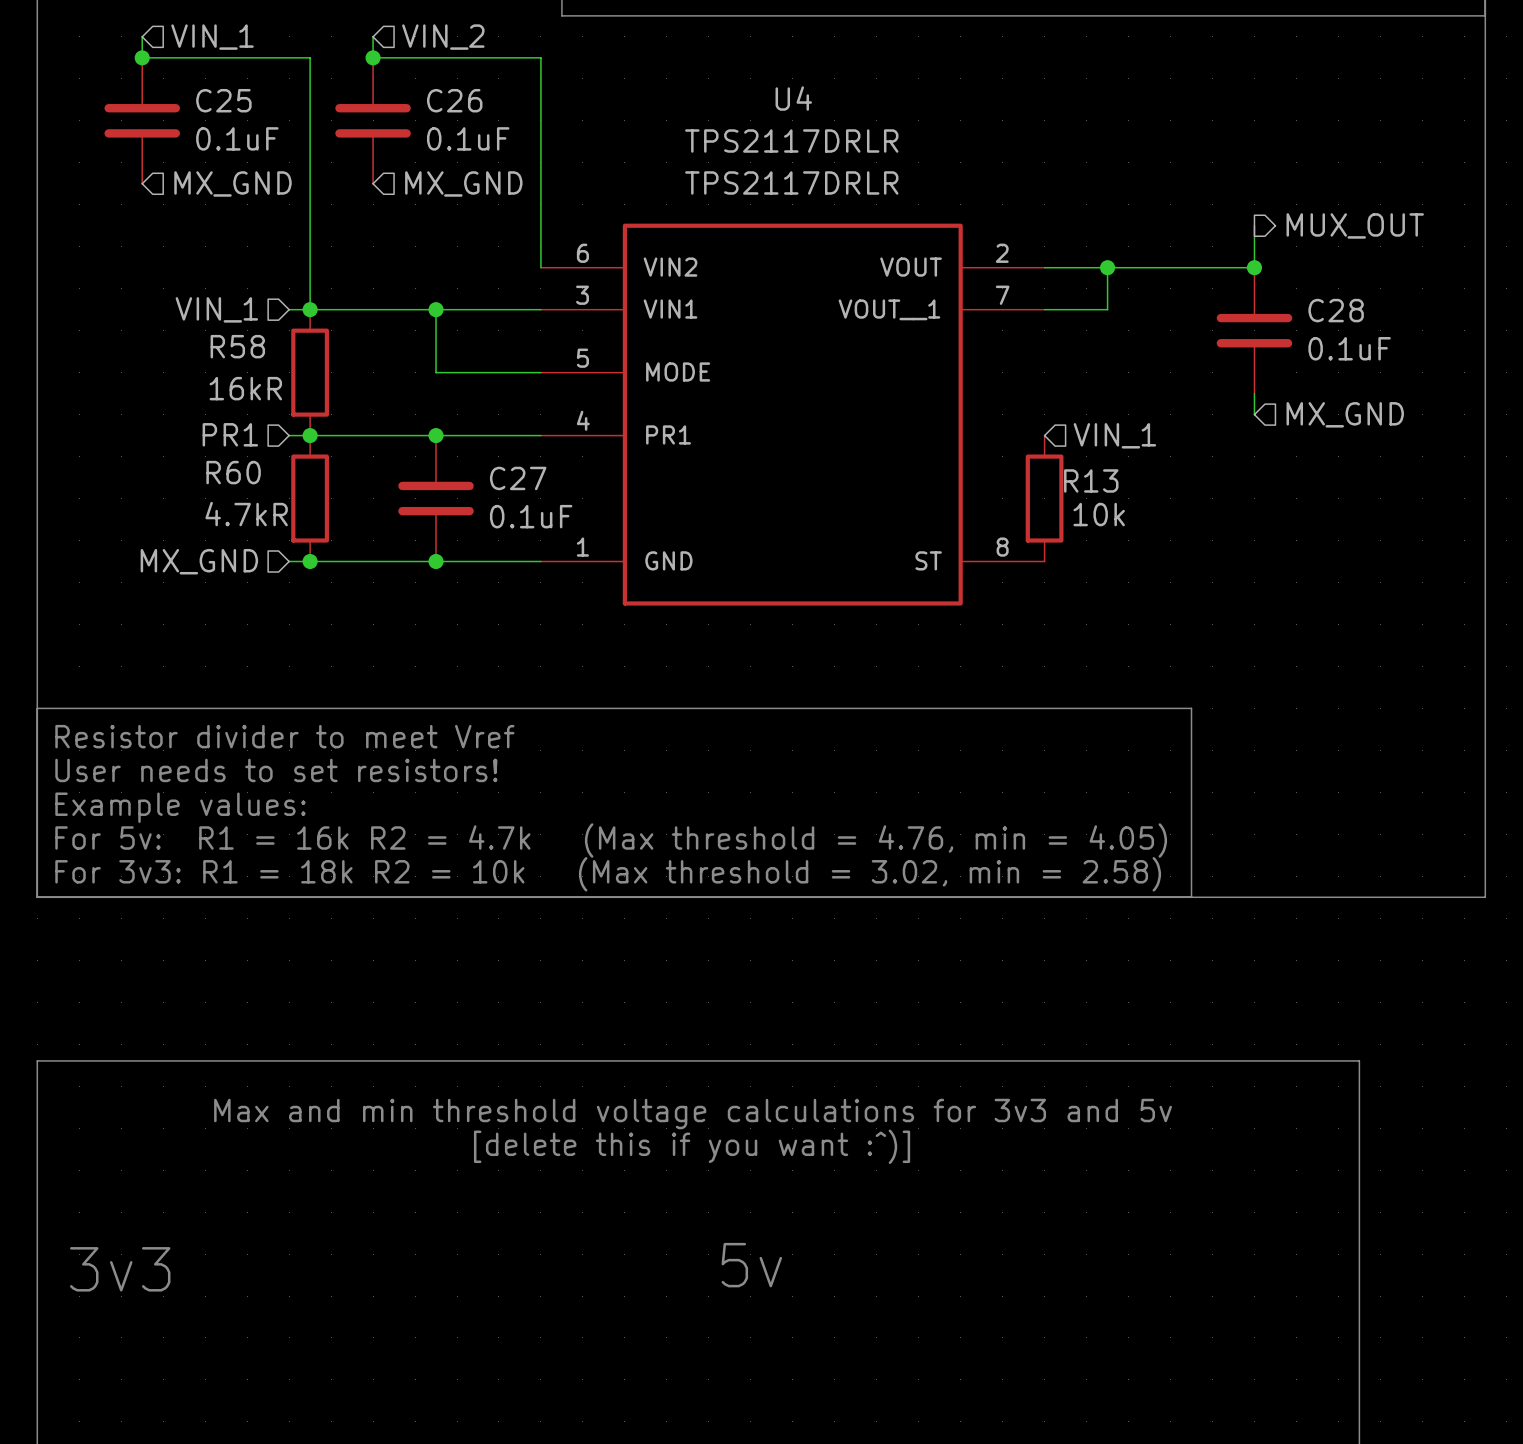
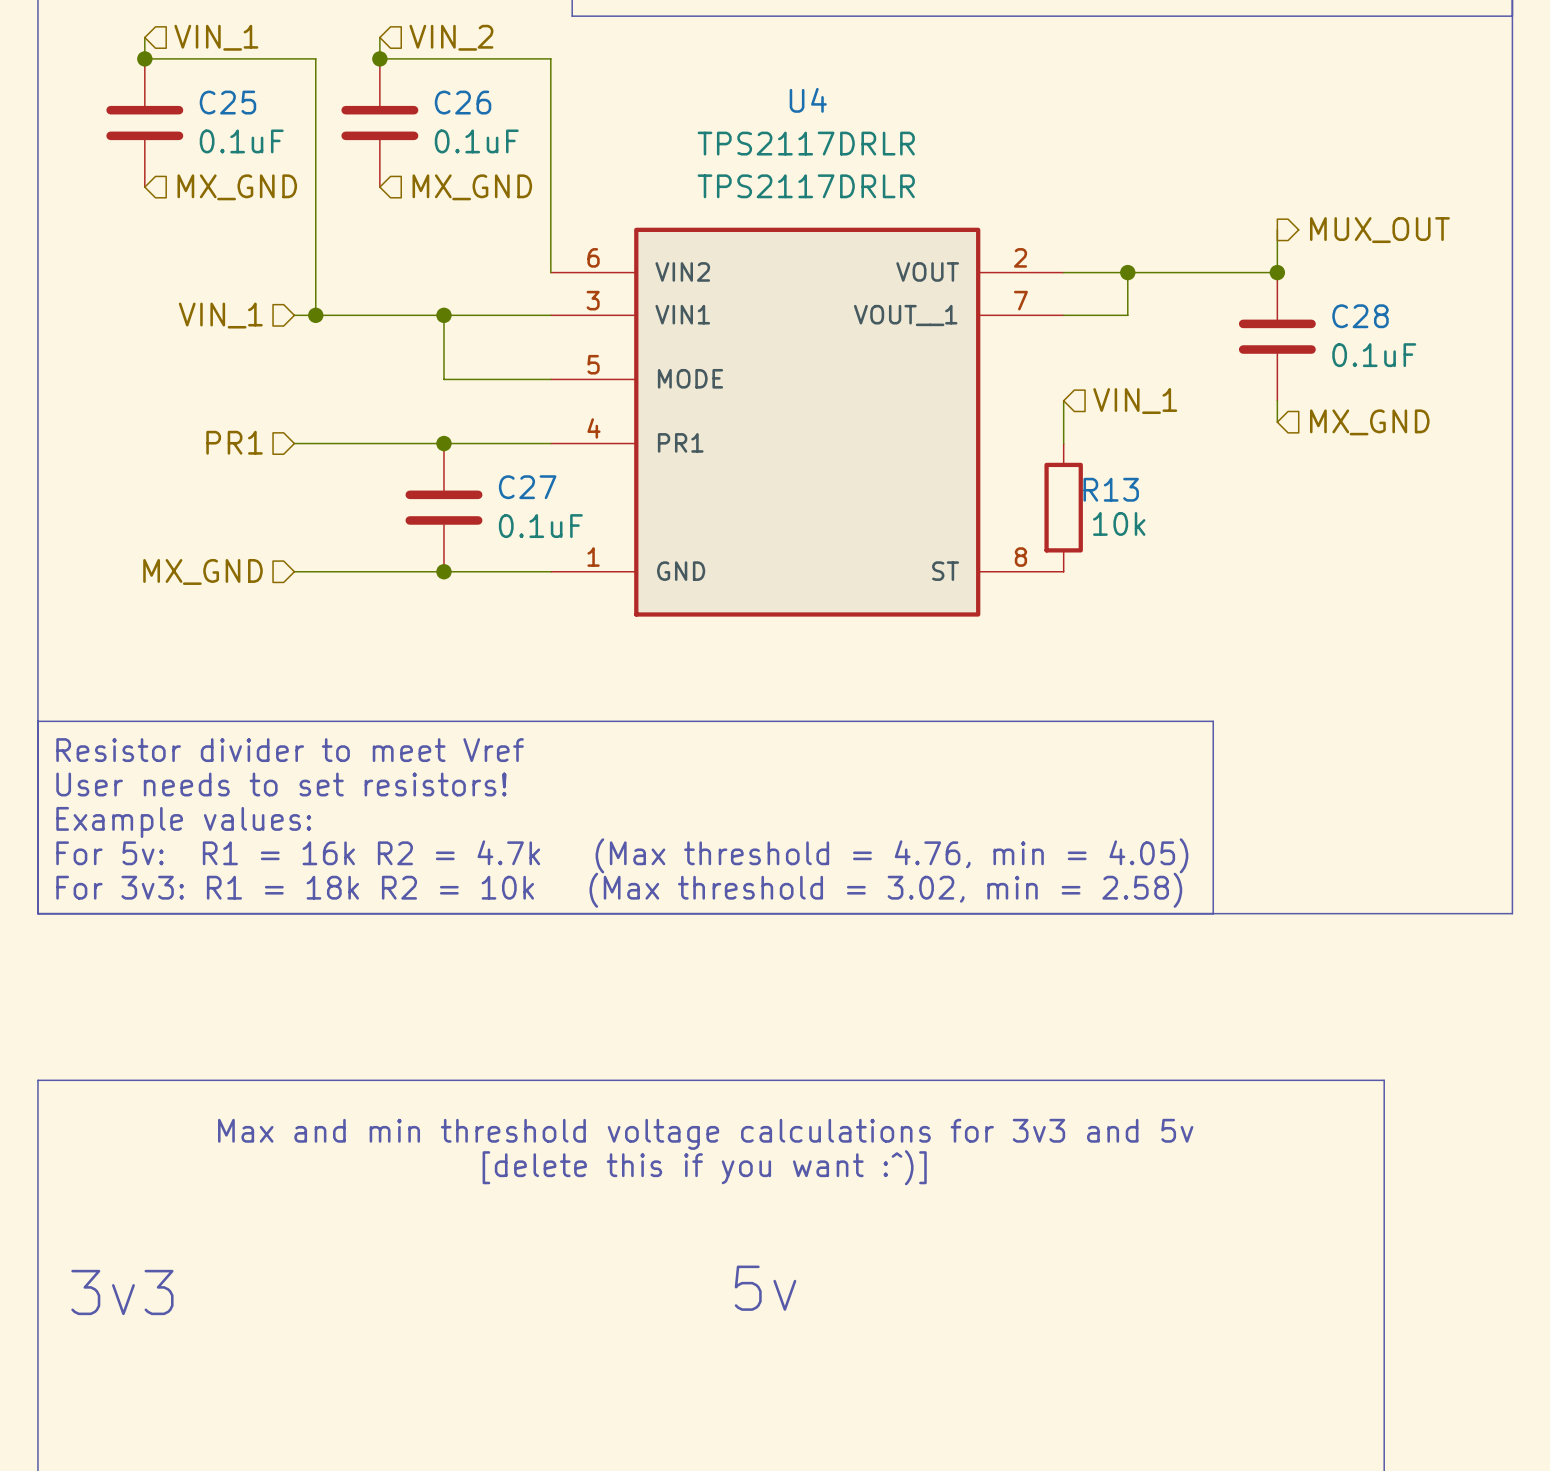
R58: 16kR (310, 372) -> none
wire: none -> (1063, 400) (1063, 443)
junction: (310, 435) -> none
hierarchical label position: VIN_1 (1114, 435) -> VIN_1 (1135, 401)
R60: 4.7kR (310, 498) -> none
junction: (310, 561) -> none

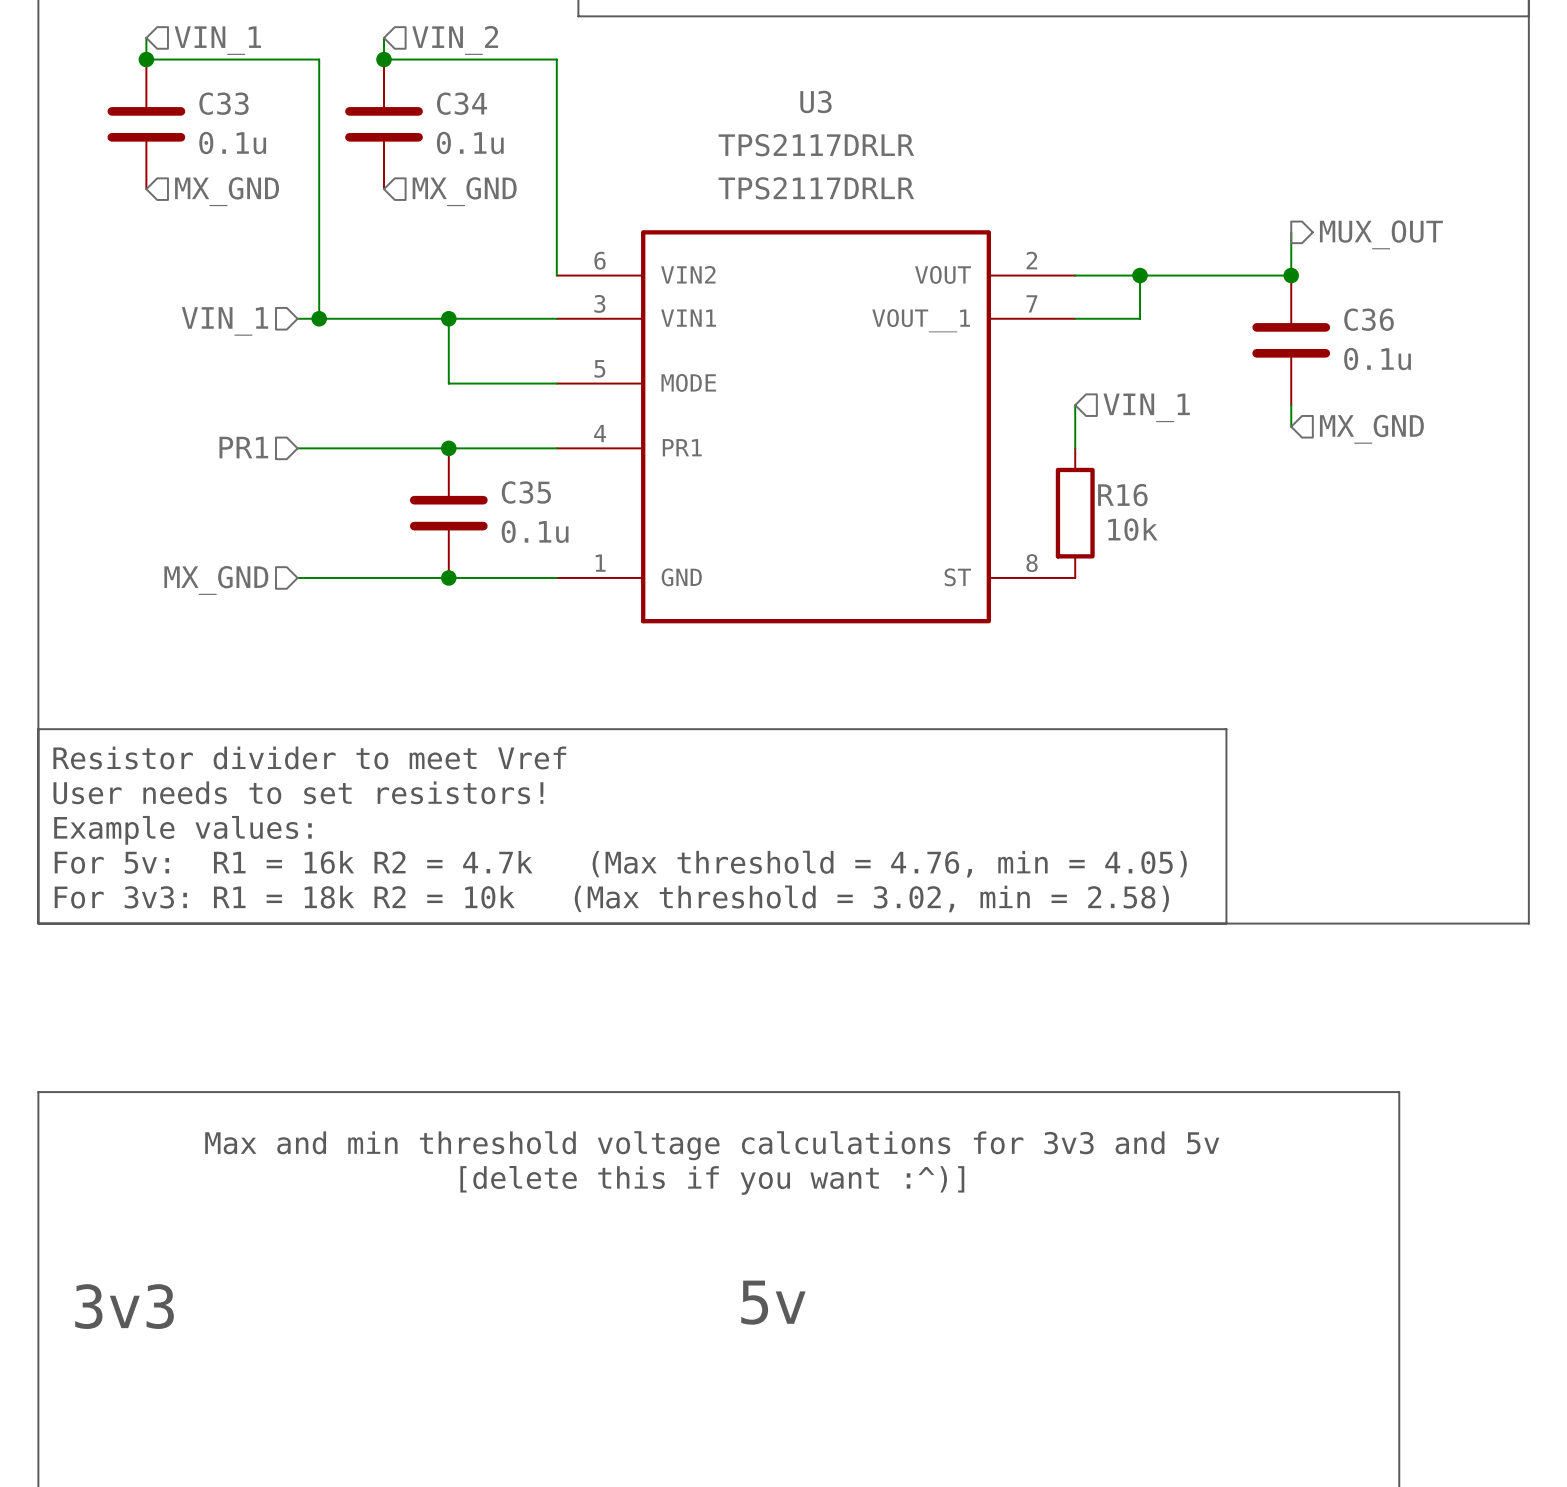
U4 name: U4 (808, 100) -> U3 (815, 101)
C25 name: C25 (227, 102) -> C33 (224, 103)
C26 name: C26 (463, 102) -> C34 (462, 103)
C25 value: 0.1uF (241, 141) -> 0.1u (232, 143)
C26 value: 0.1uF (476, 141) -> 0.1u (470, 143)
C28 name: C28 (1360, 316) -> C36 (1369, 319)
C28 value: 0.1uF (1374, 355) -> 0.1u (1377, 359)
C27 name: C27 (527, 487) -> C35 (526, 492)
R13 name: R13 (1111, 489) -> R16 (1122, 495)
C27 value: 0.1uF (540, 526) -> 0.1u (535, 531)

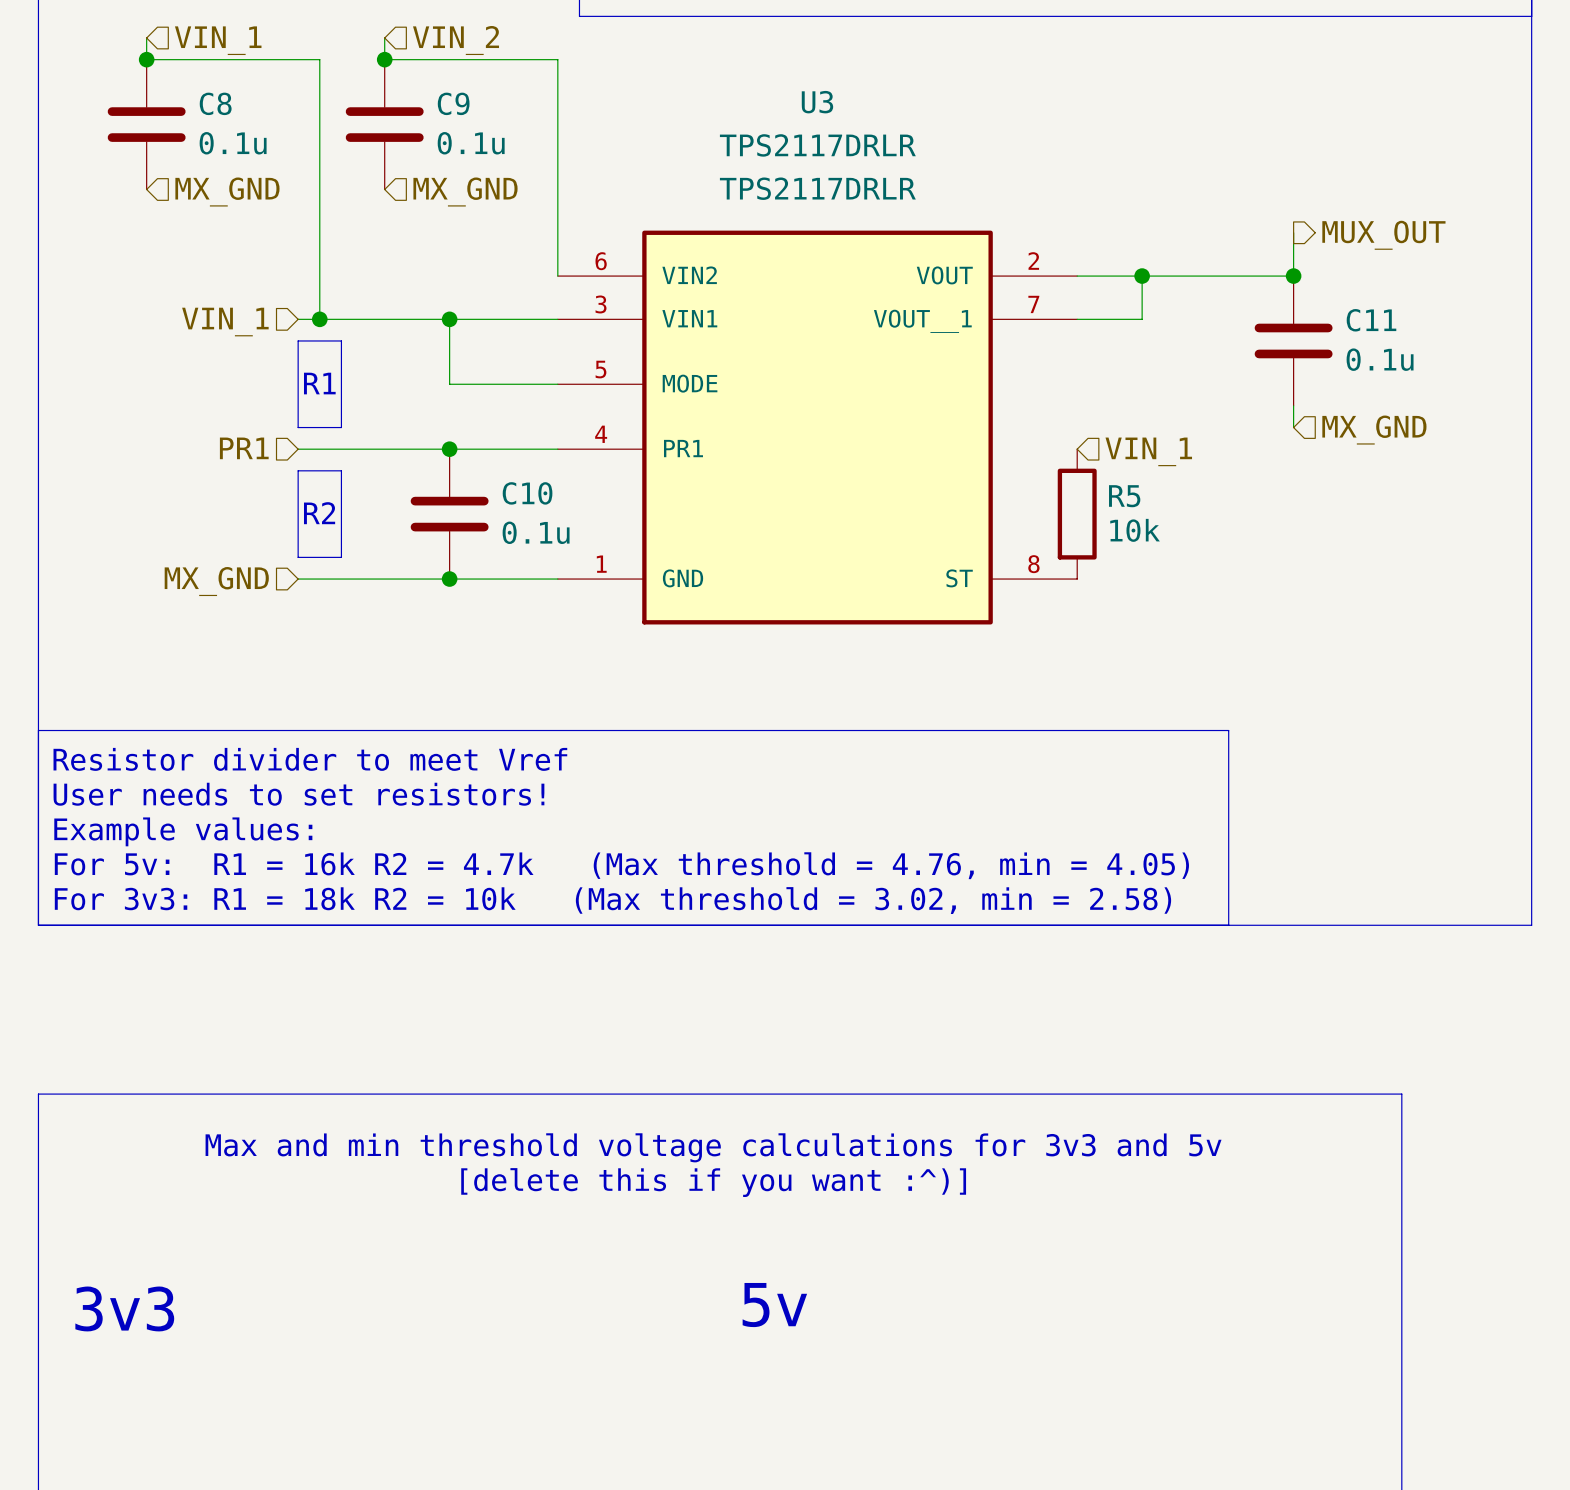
C33 name: C33 (224, 103) -> C8 (215, 103)
C34 name: C34 (462, 103) -> C9 (453, 103)
C36 name: C36 (1369, 319) -> C11 (1371, 320)
line: none -> (298, 340) (341, 340) (341, 427) (298, 427) (298, 340)
text: none -> R1 (319, 383)
wire: (1075, 405) (1075, 448) -> none
hierarchical label position: VIN_1 (1146, 407) -> VIN_1 (1148, 451)
line: none -> (298, 470) (298, 557) (341, 557) (341, 470) (298, 470)
C35 name: C35 (526, 492) -> C10 (527, 493)
R16 name: R16 (1122, 495) -> R5 (1124, 496)
text: none -> R2 (319, 513)

